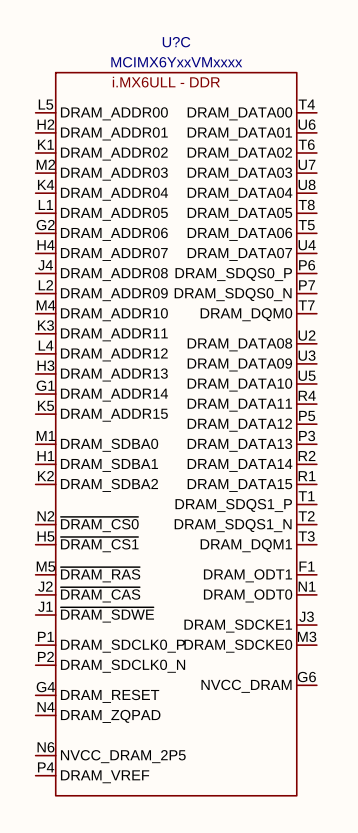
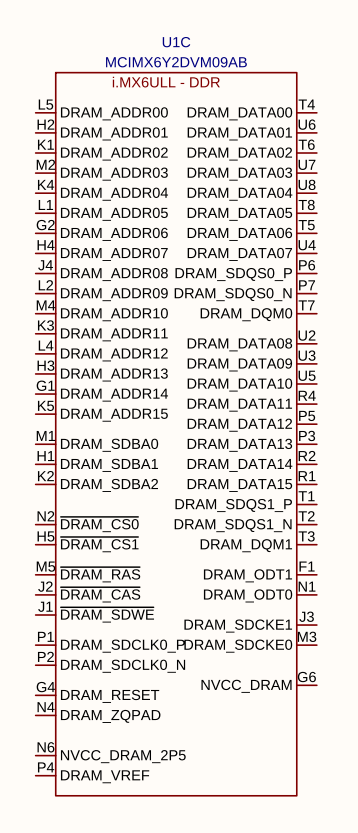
U?C name: U?C (176, 42) -> U1C (176, 42)
U?C value: MCIMX6YxxVMxxxx (176, 62) -> MCIMX6Y2DVM09AB (176, 62)

